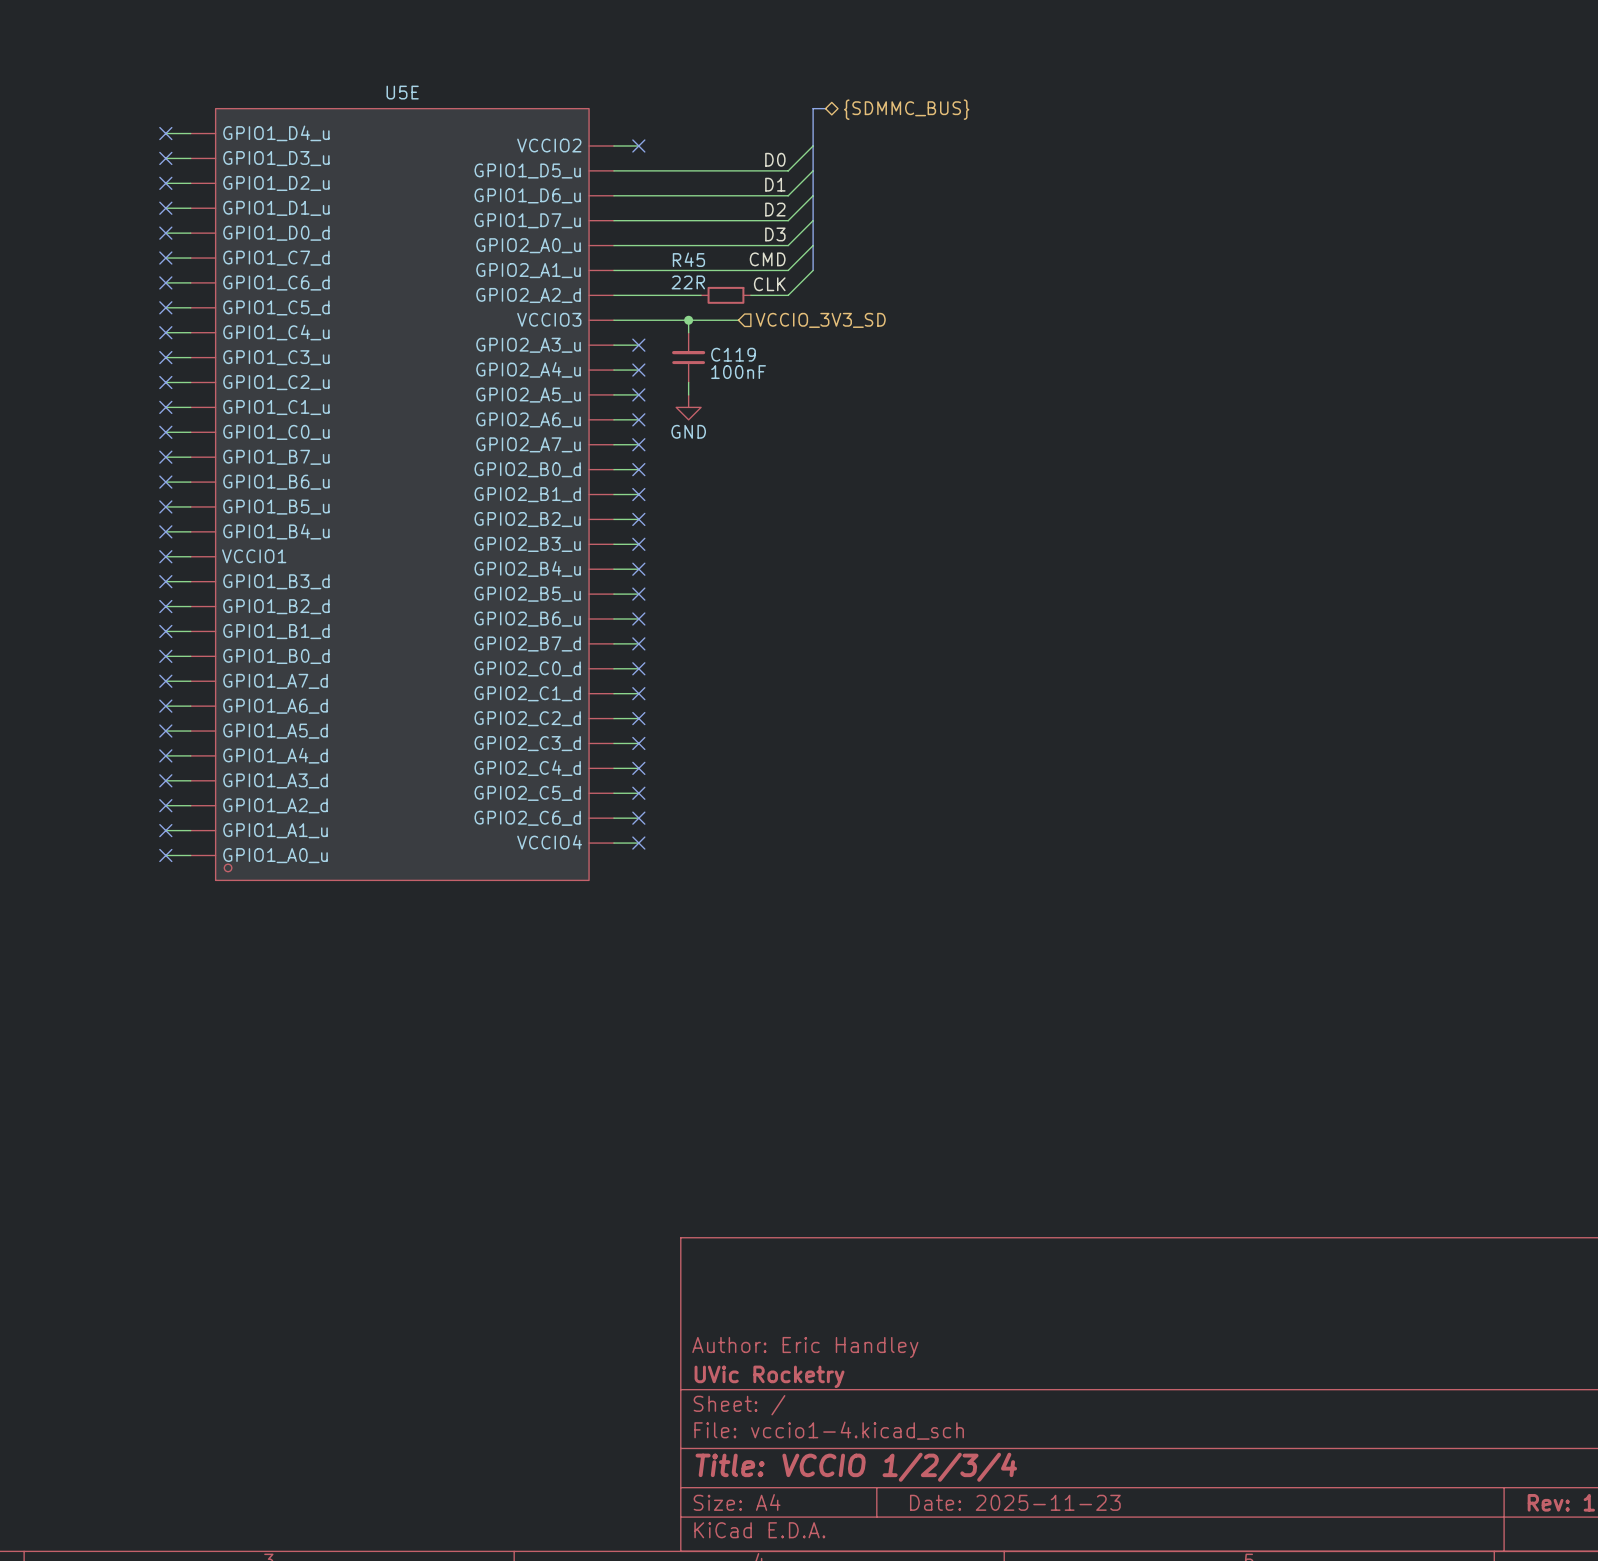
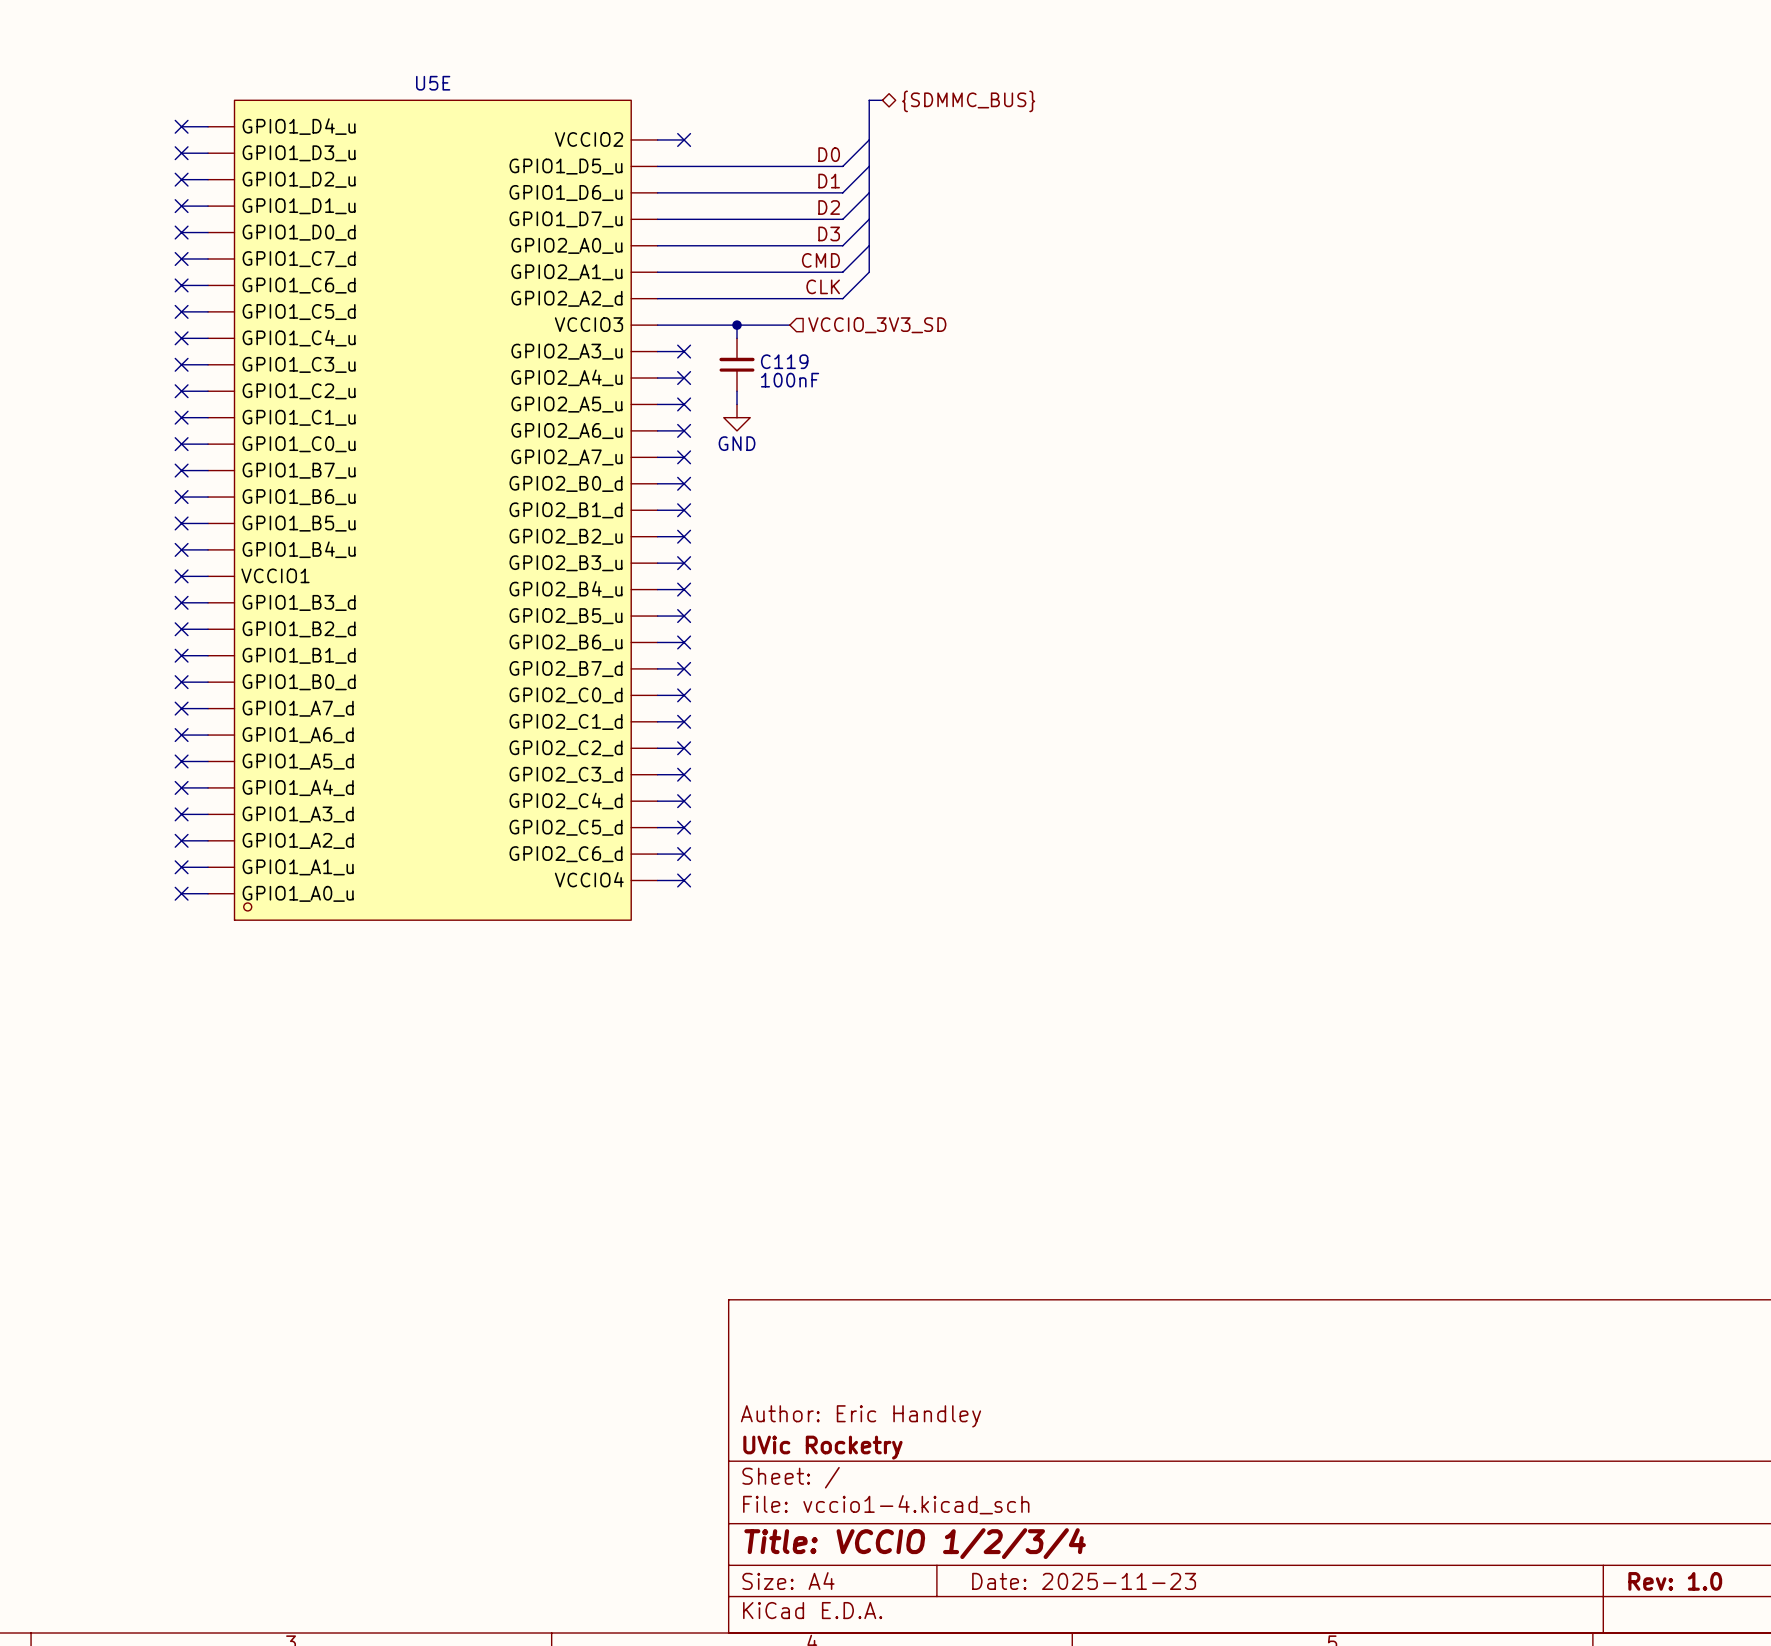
wire: none -> (750, 298) (803, 298)
R45: 22R (725, 295) -> none

